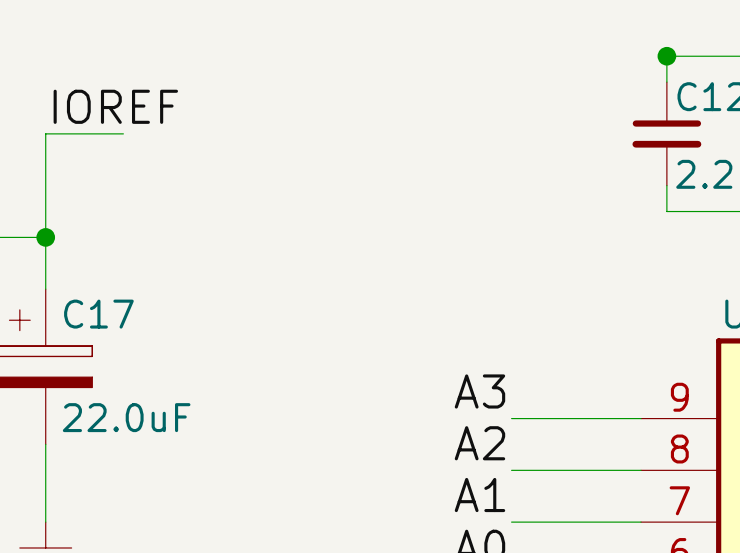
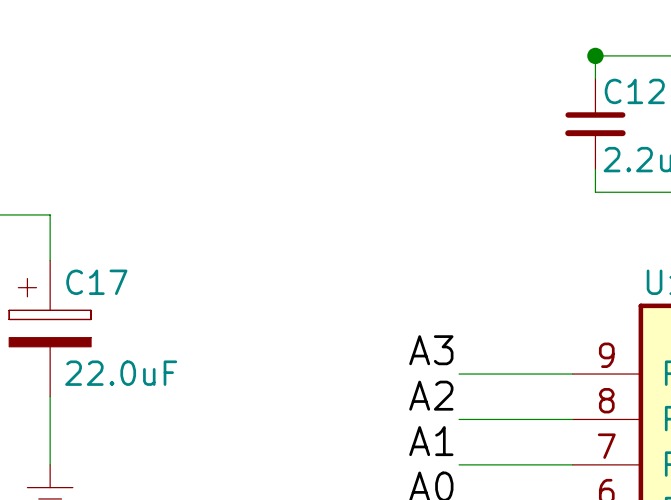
label: IOREF (115, 106) -> none
wire: (123, 133) (45, 133) (45, 237) -> none
junction: (45, 237) -> none

